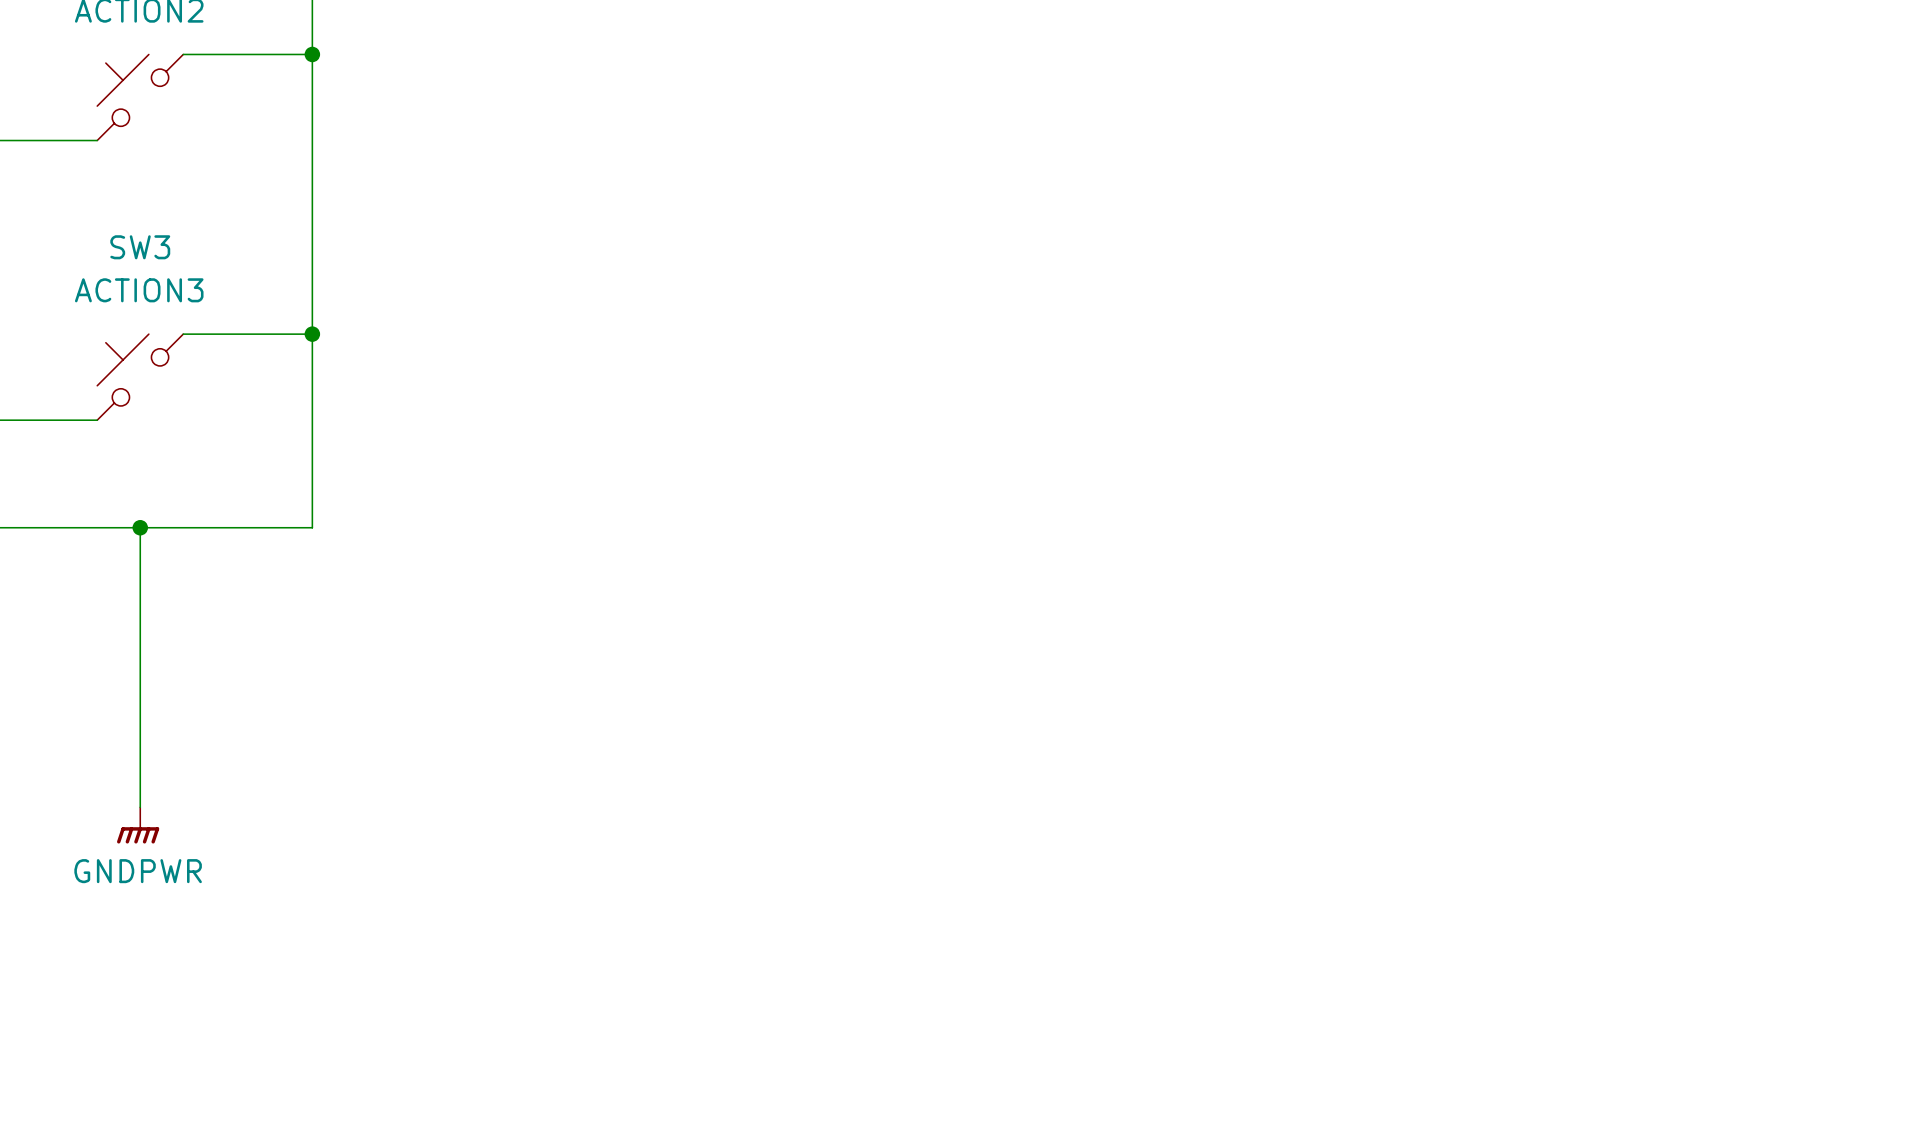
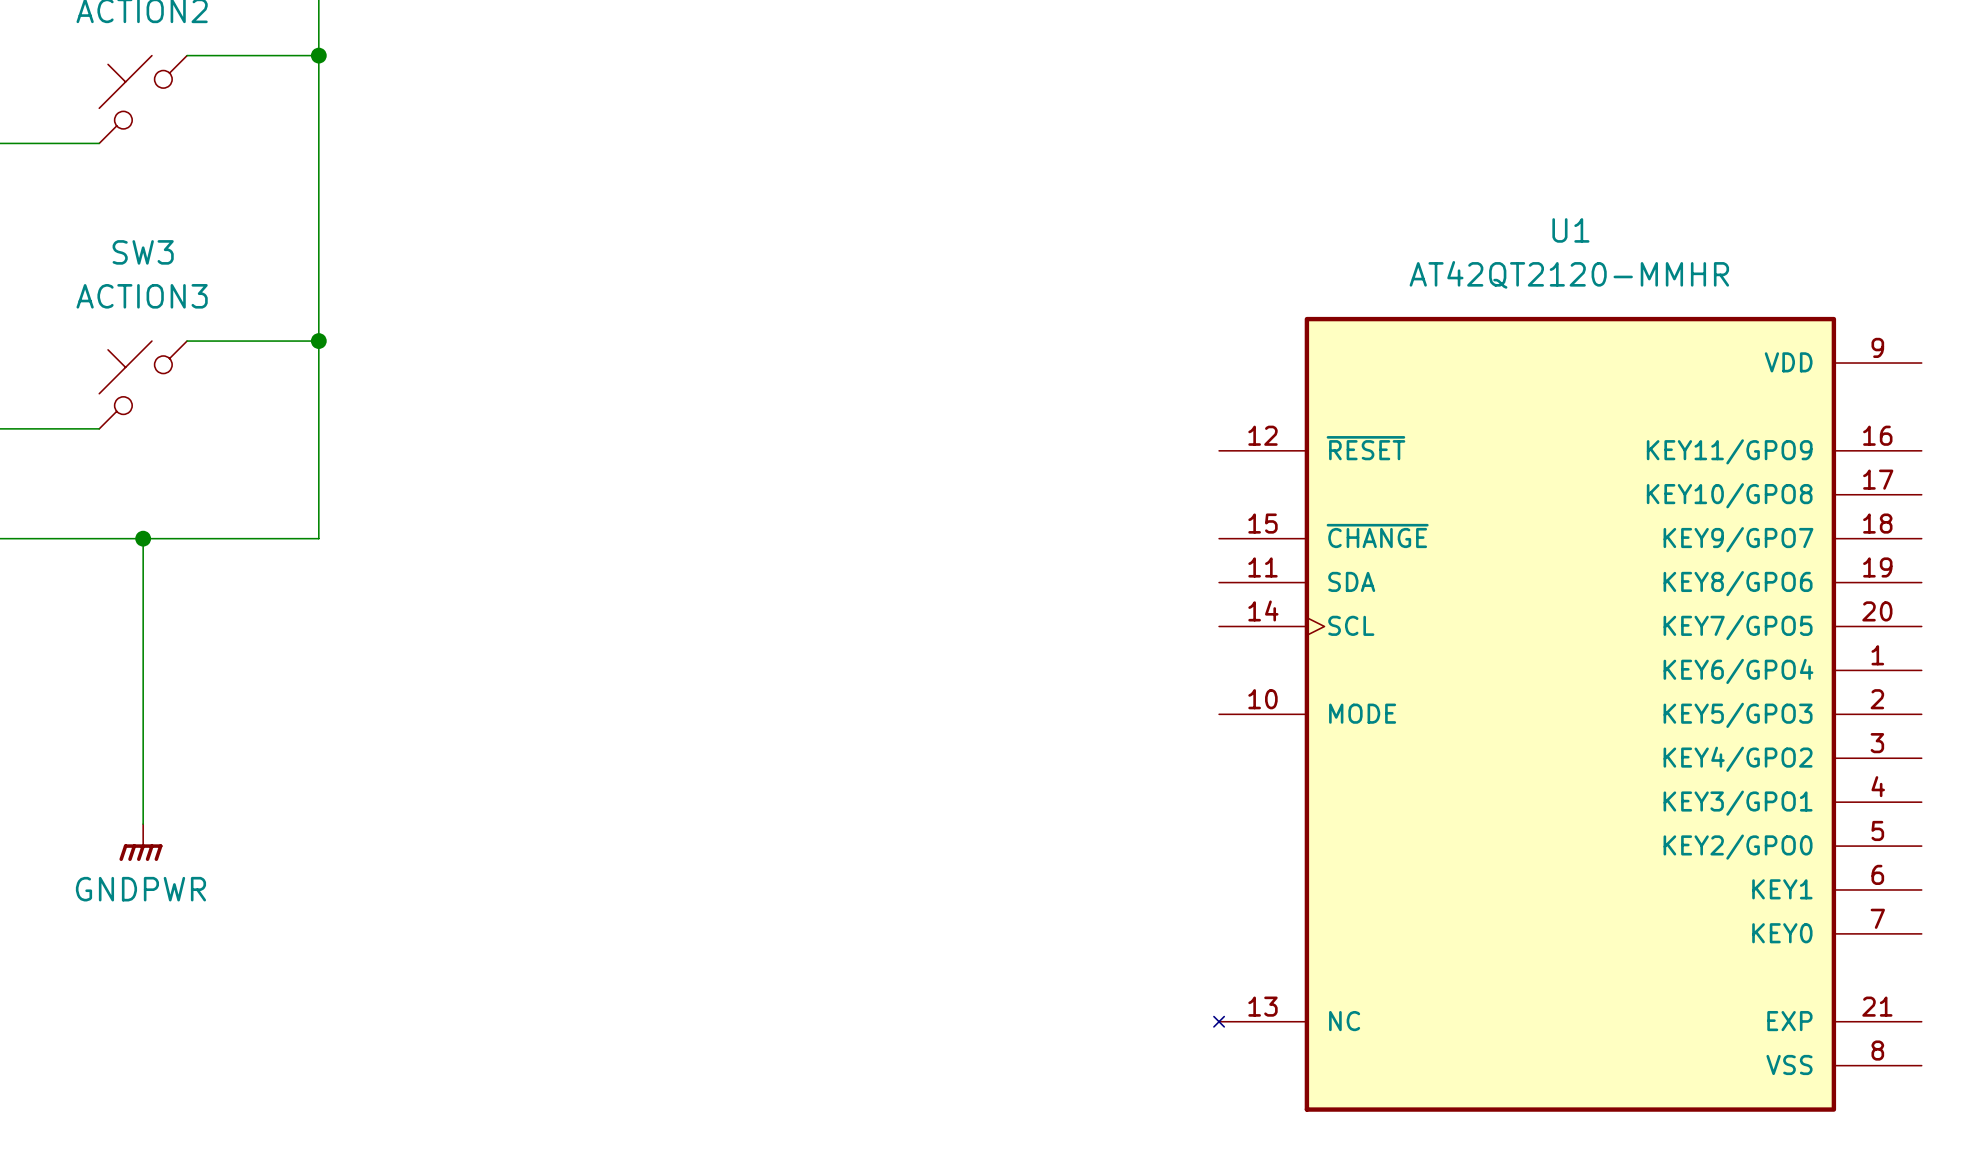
U1: none -> AT42QT2120-MMHR (1567, 714)

